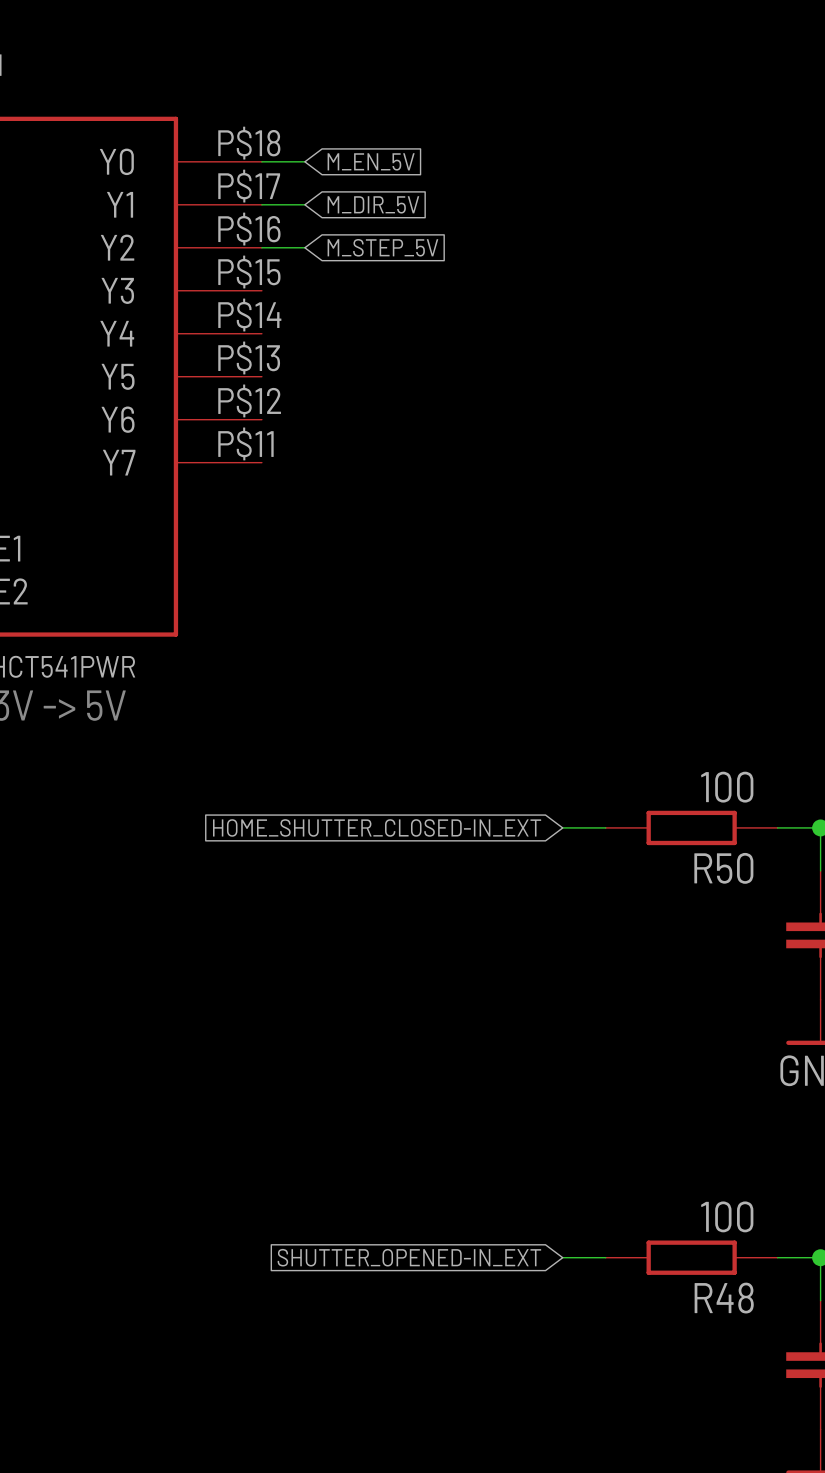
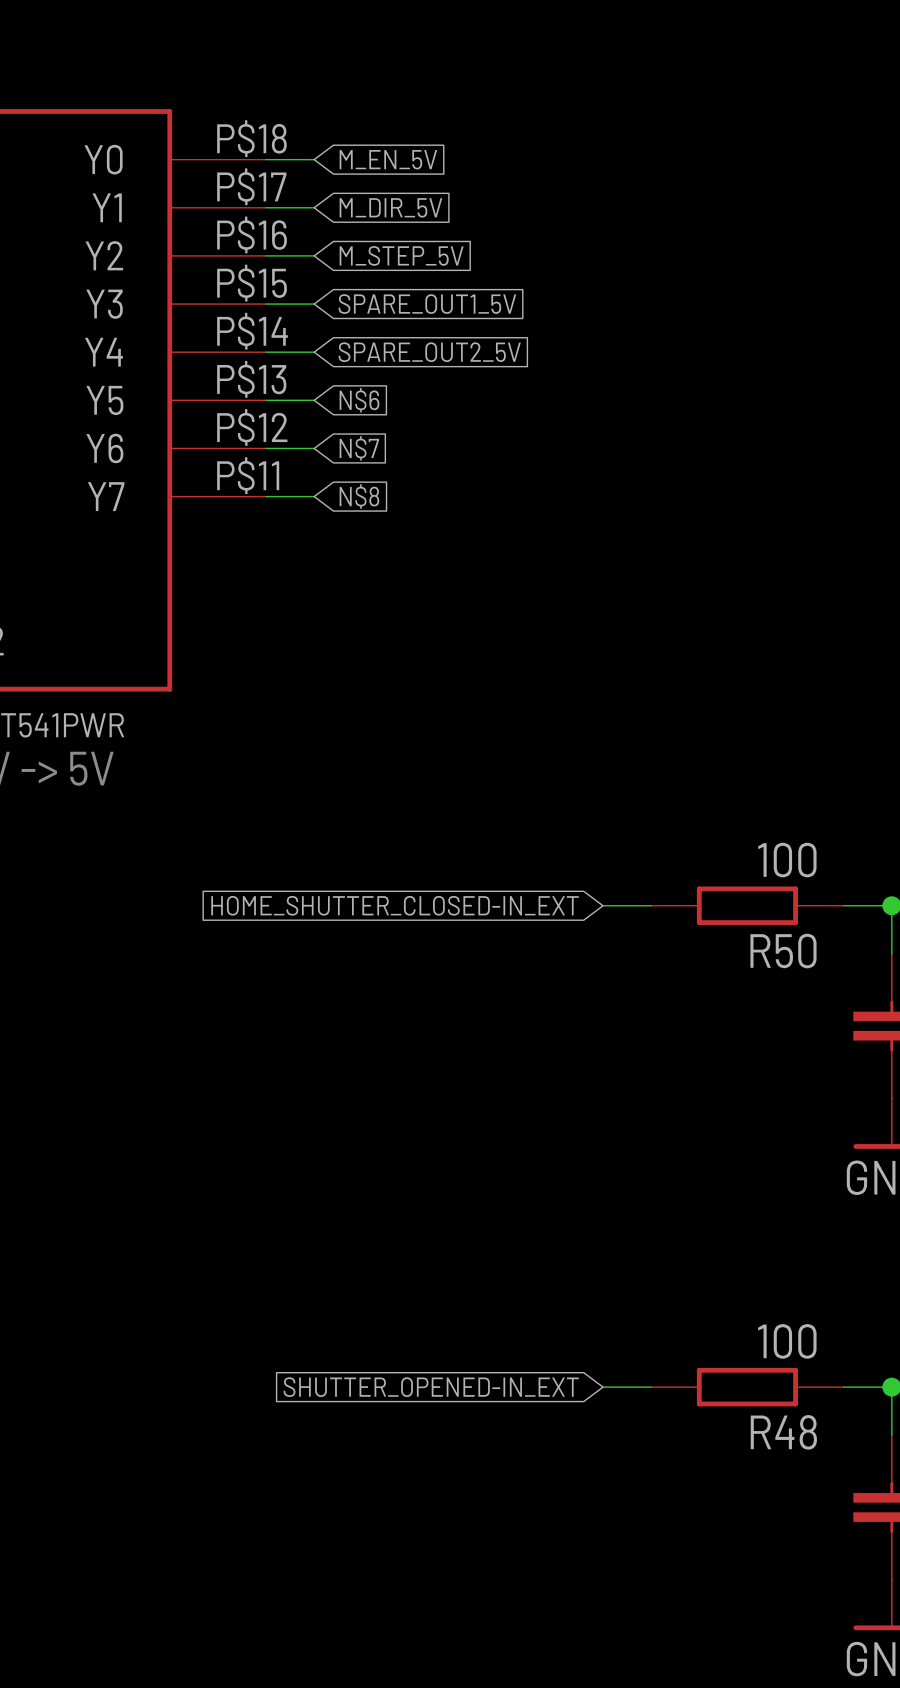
wire: none -> (266, 304) (314, 304)
global label: none -> SPARE_OUT1_5V (427, 304)
wire: none -> (266, 352) (314, 352)
global label: none -> SPARE_OUT2_5V (429, 352)
wire: none -> (266, 400) (314, 400)
global label: none -> N$6 (359, 400)
wire: none -> (266, 448) (314, 448)
global label: none -> N$7 (359, 448)
wire: none -> (266, 496) (314, 496)
global label: none -> N$8 (359, 496)

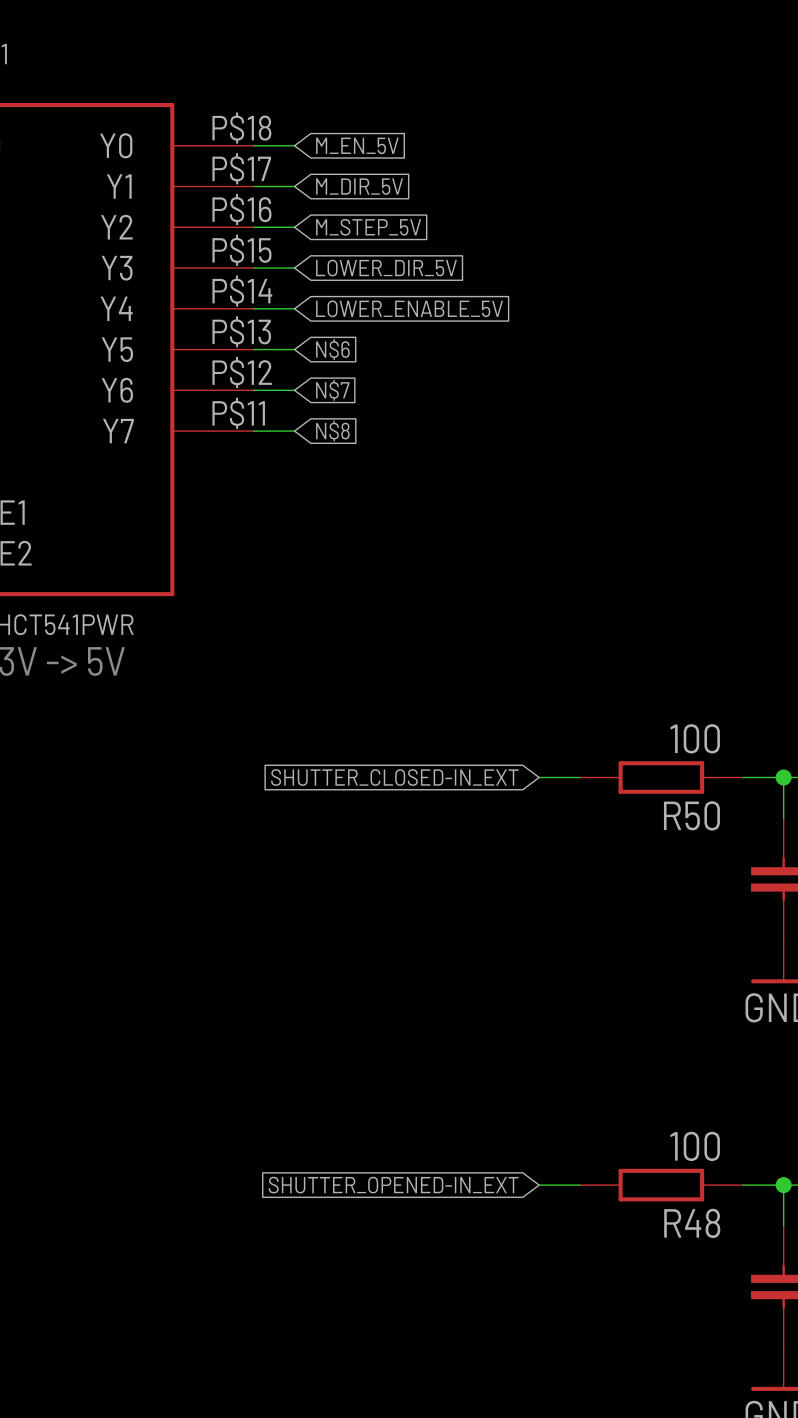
global label: SPARE_OUT1_5V (427, 304) -> LOWER_DIR_5V (386, 268)
global label: SPARE_OUT2_5V (429, 352) -> LOWER_ENABLE_5V (409, 308)
global label: HOME_SHUTTER_CLOSED-IN_EXT (395, 905) -> SHUTTER_CLOSED-IN_EXT (394, 777)

